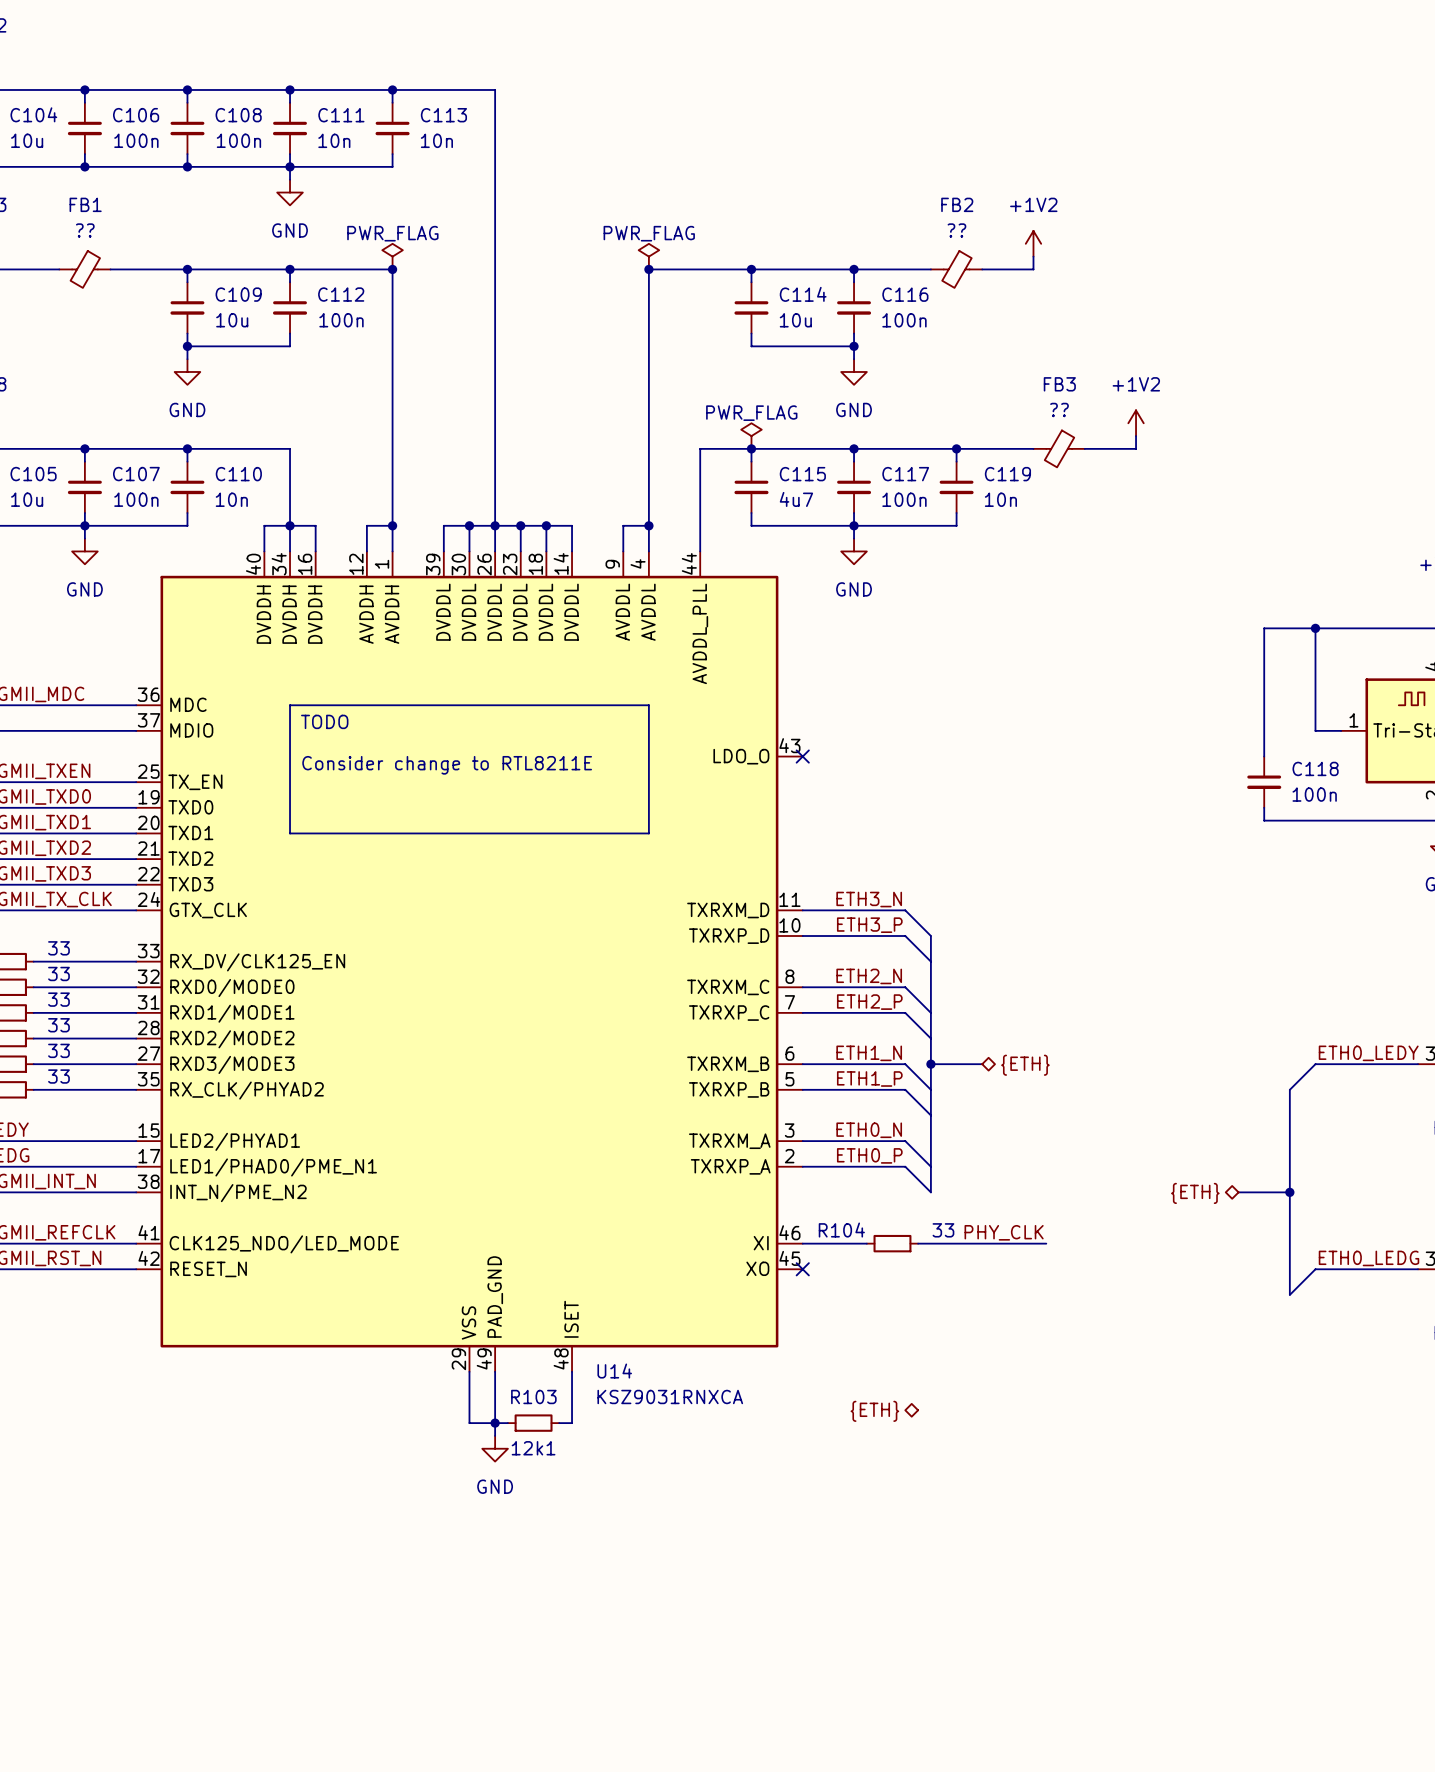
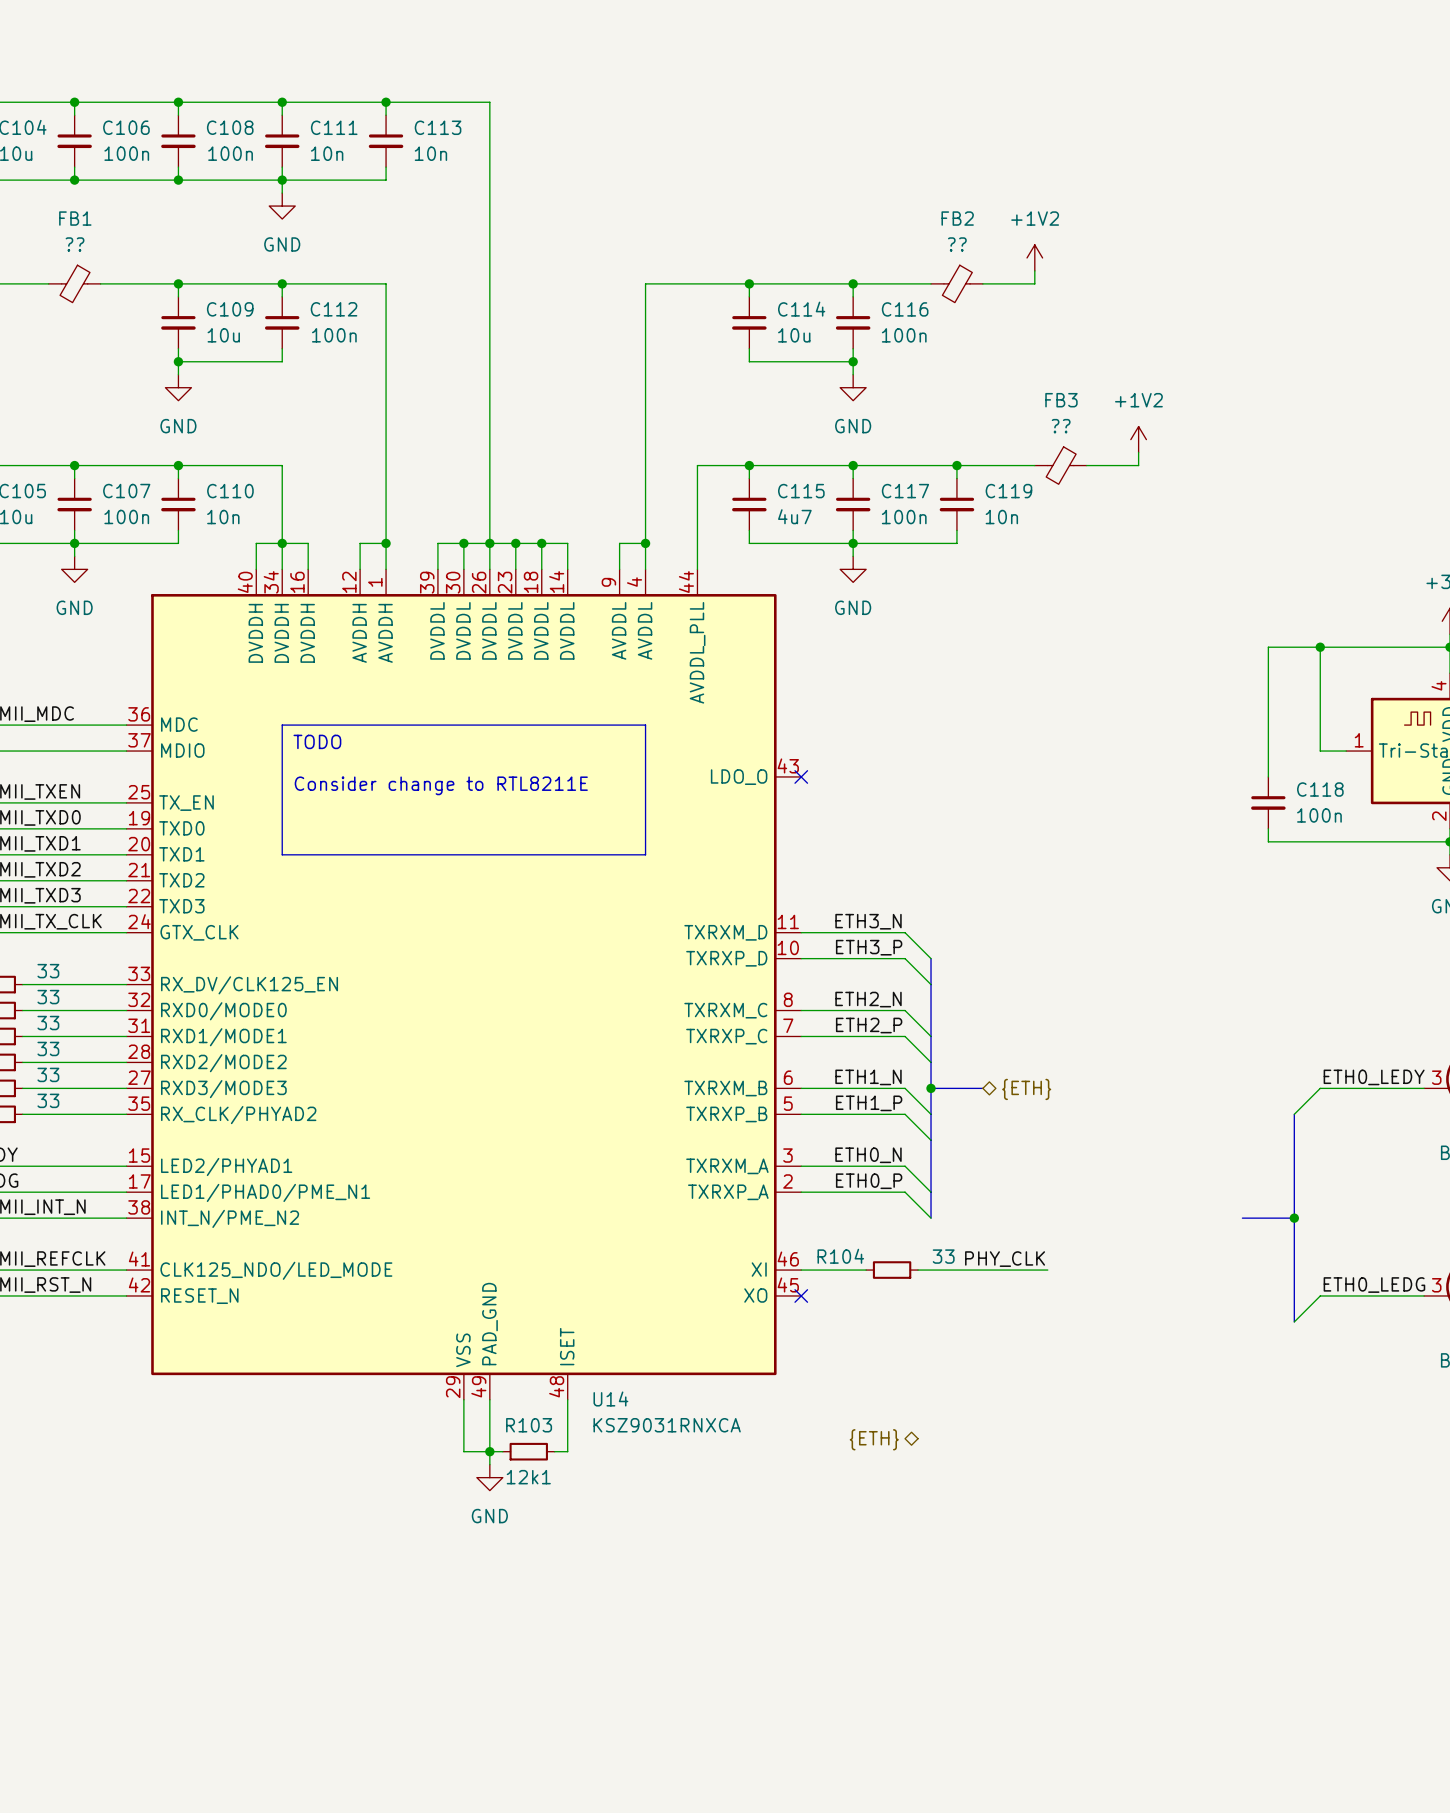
power symbol: PWR_FLAG (392, 256) -> none
power symbol: PWR_FLAG (648, 256) -> none
junction: (392, 269) -> none
junction: (648, 269) -> none
power symbol: PWR_FLAG (751, 436) -> none
hierarchical label: {ETH} (1195, 1193) -> none

